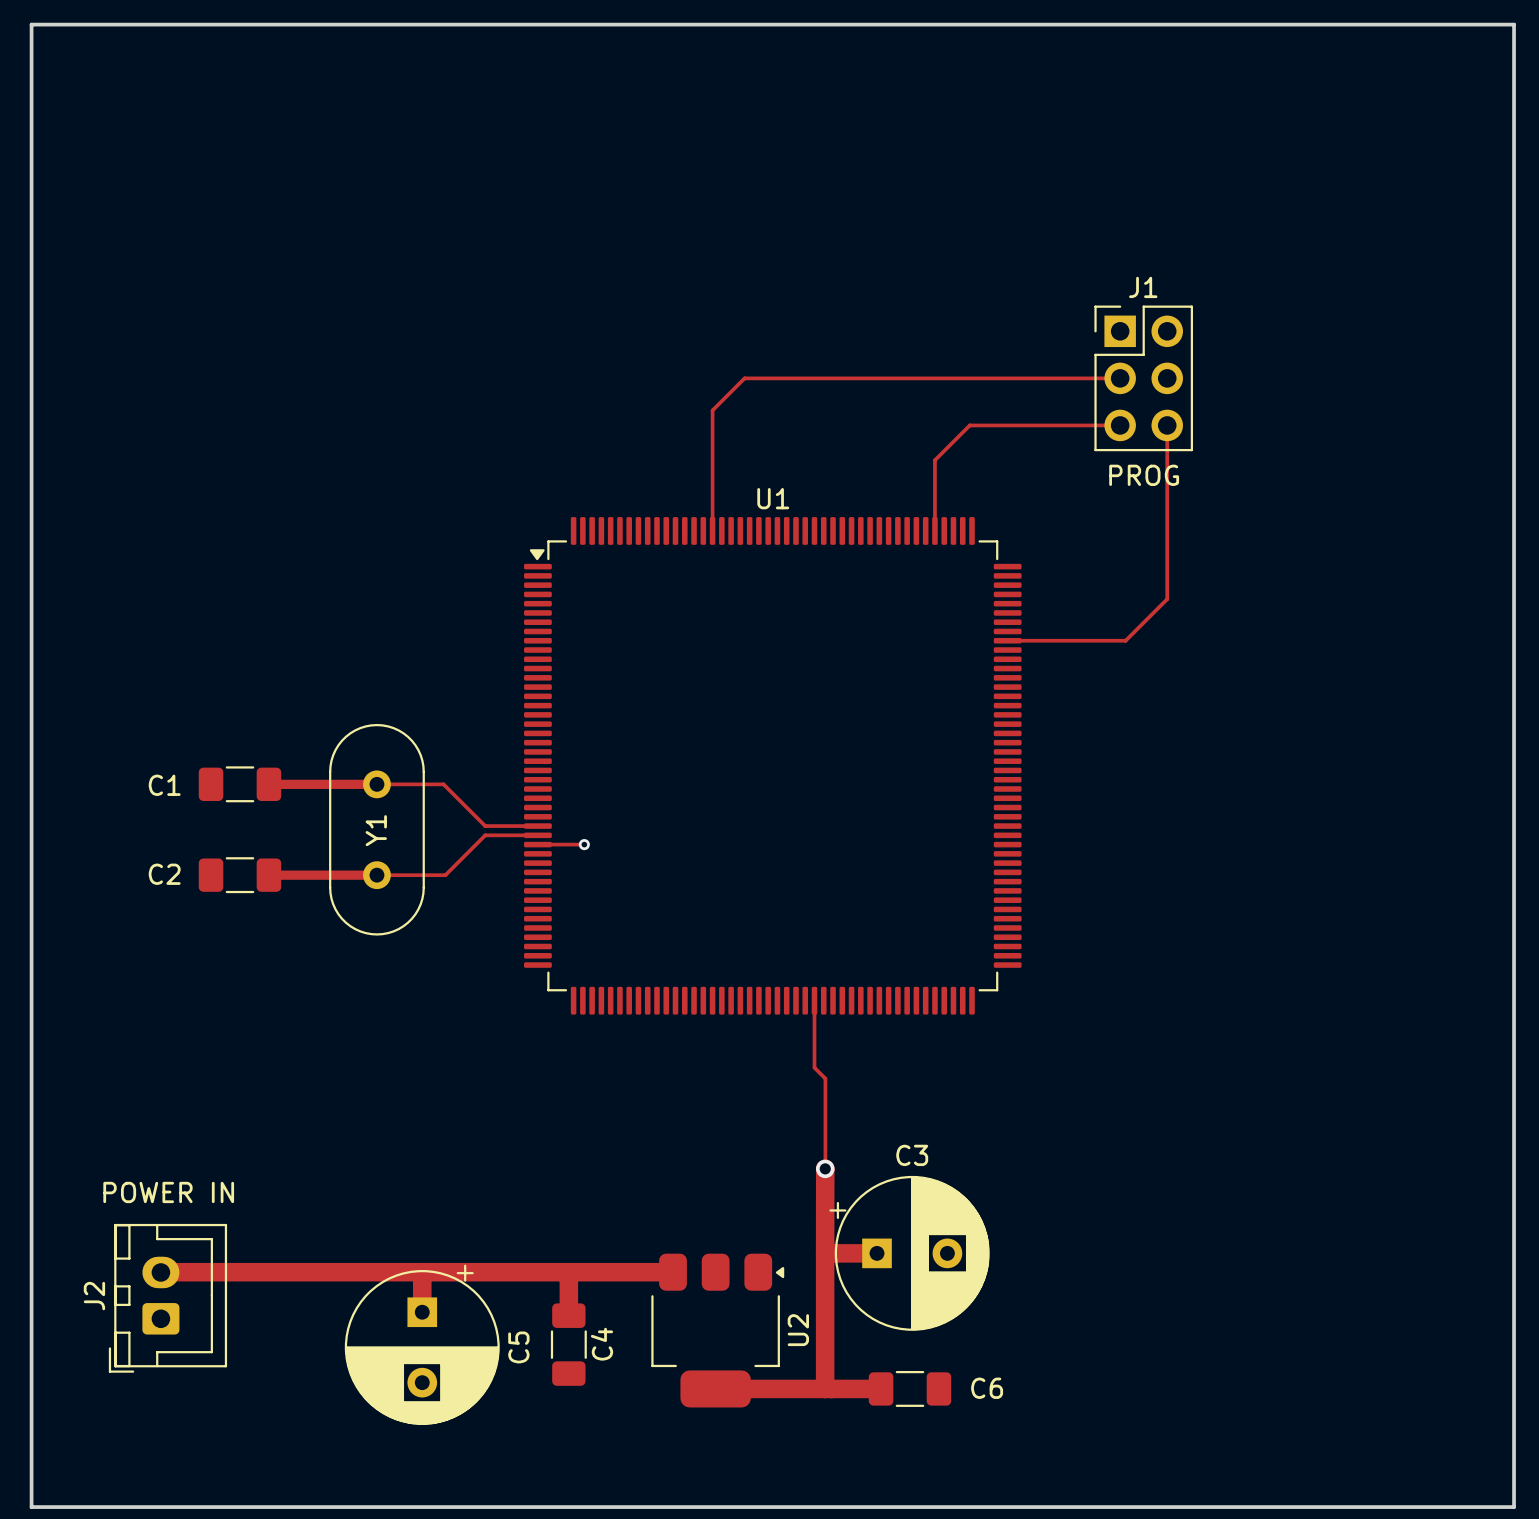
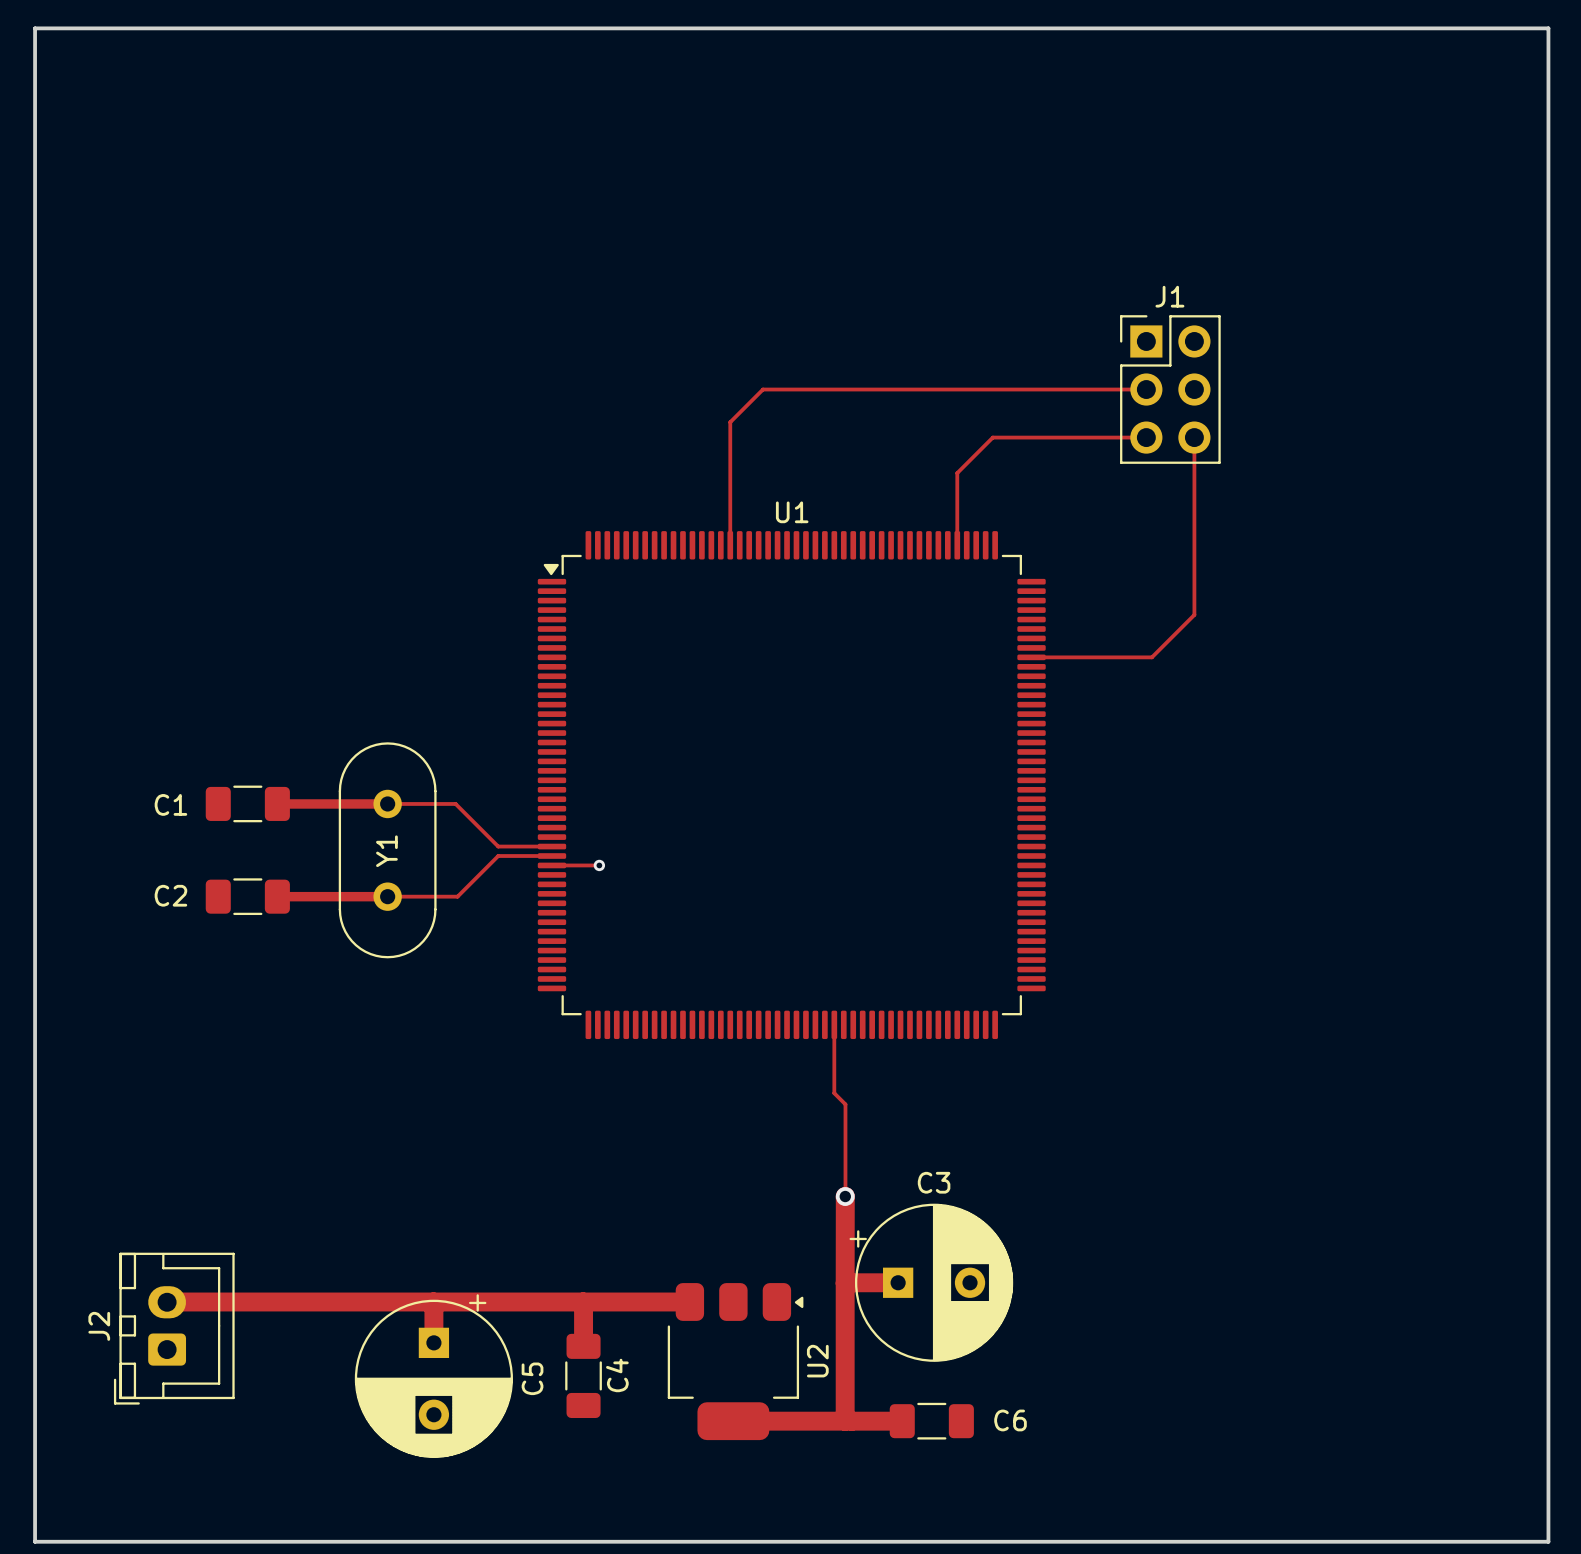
J1 value: PROG (1144, 475) -> none
J2 value: POWER IN (168, 1192) -> none

